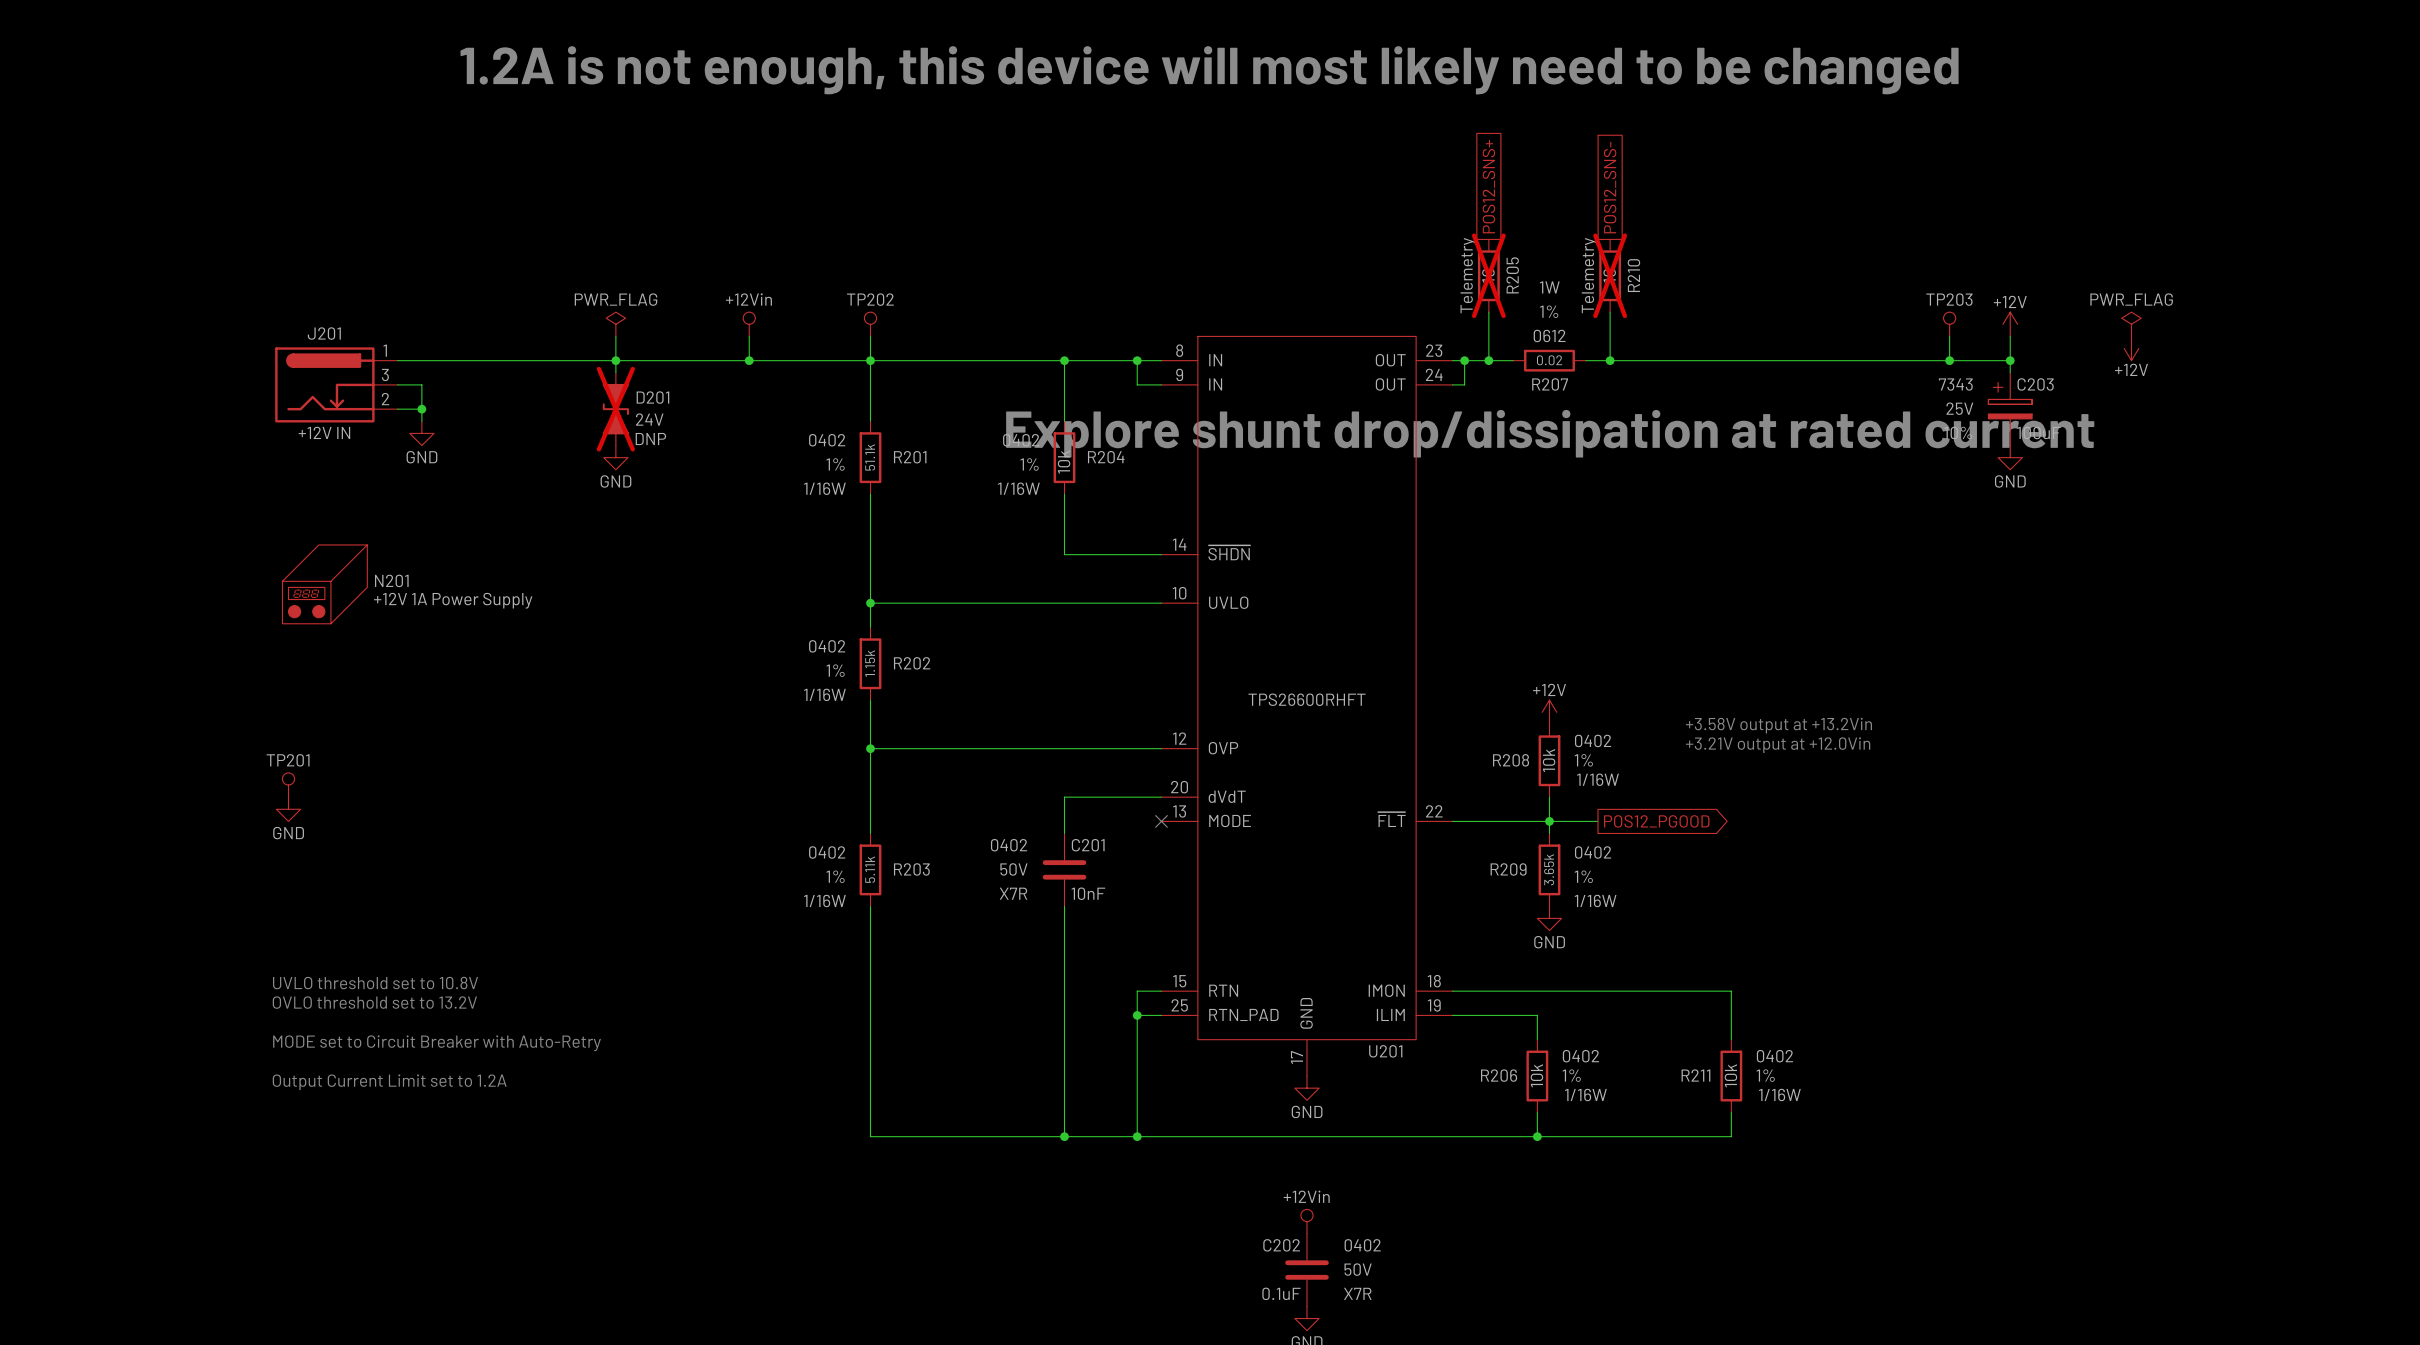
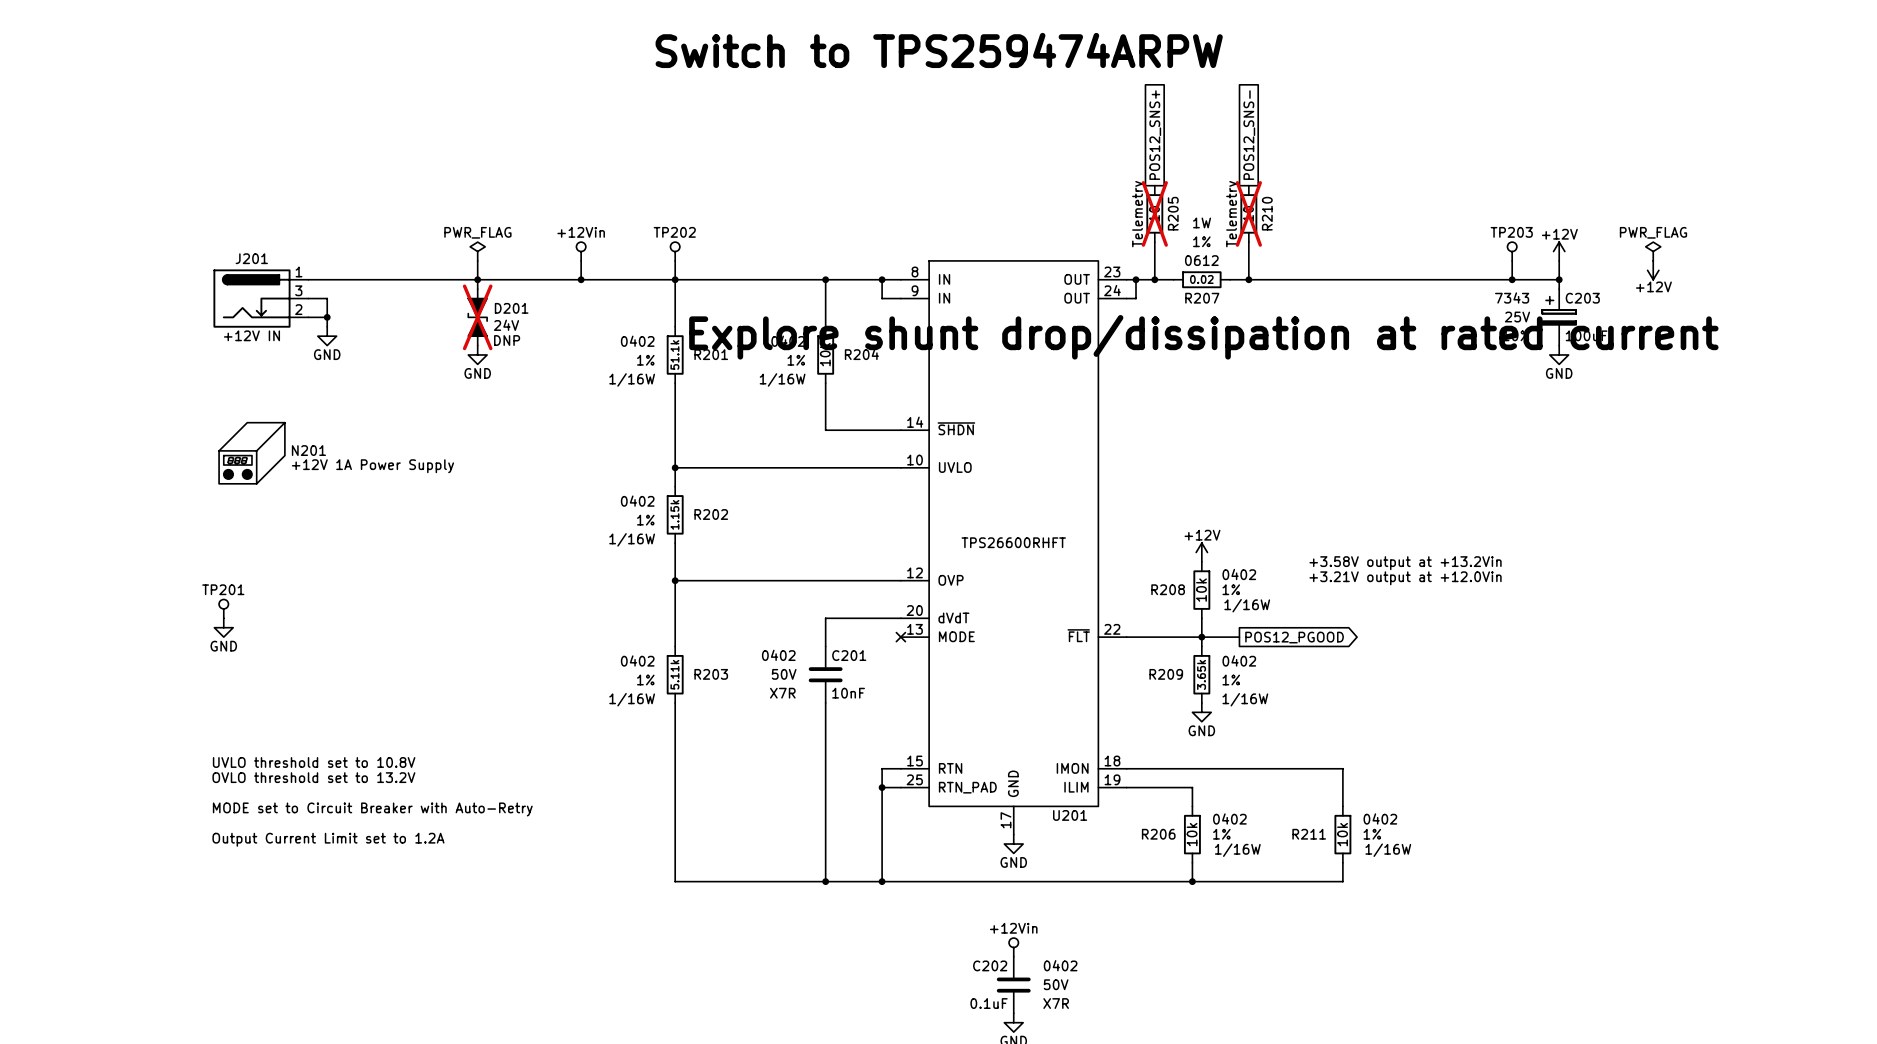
text: 1.2A is not enough, this device will most likely need to be changed (1209, 70) -> Switch to TPS259474ARPW (939, 50)

